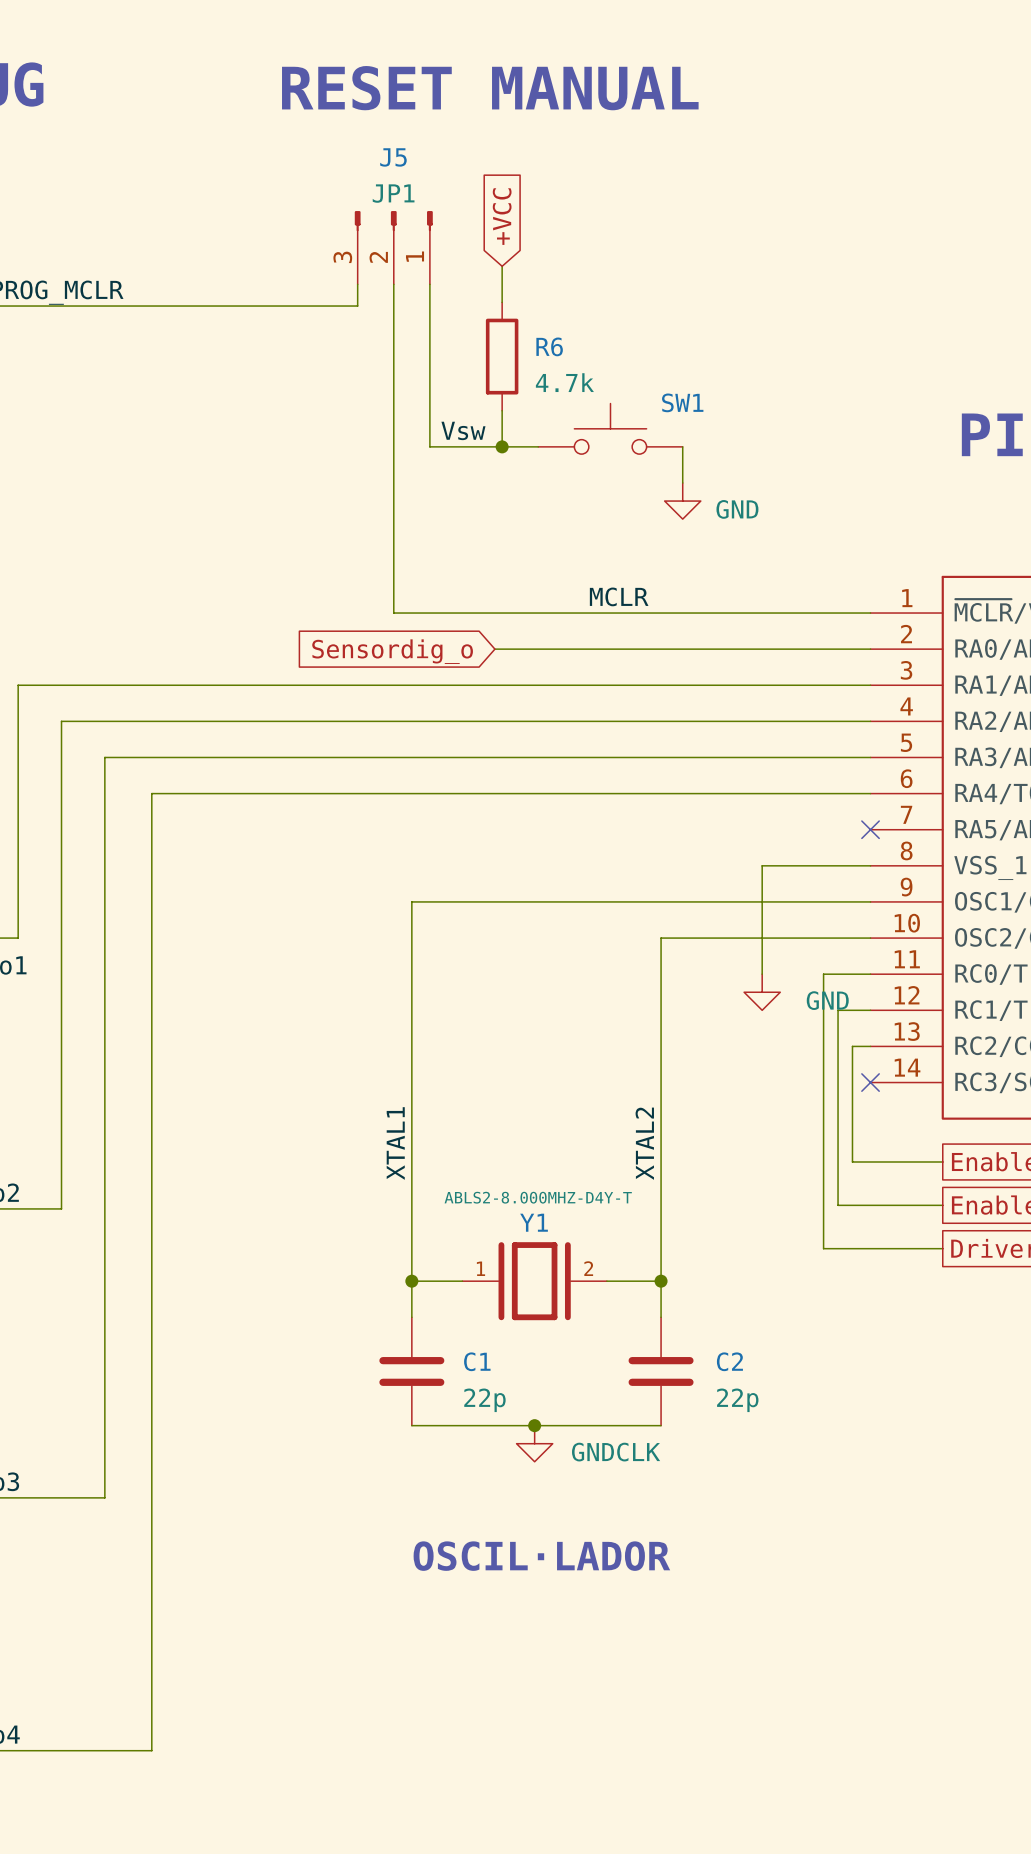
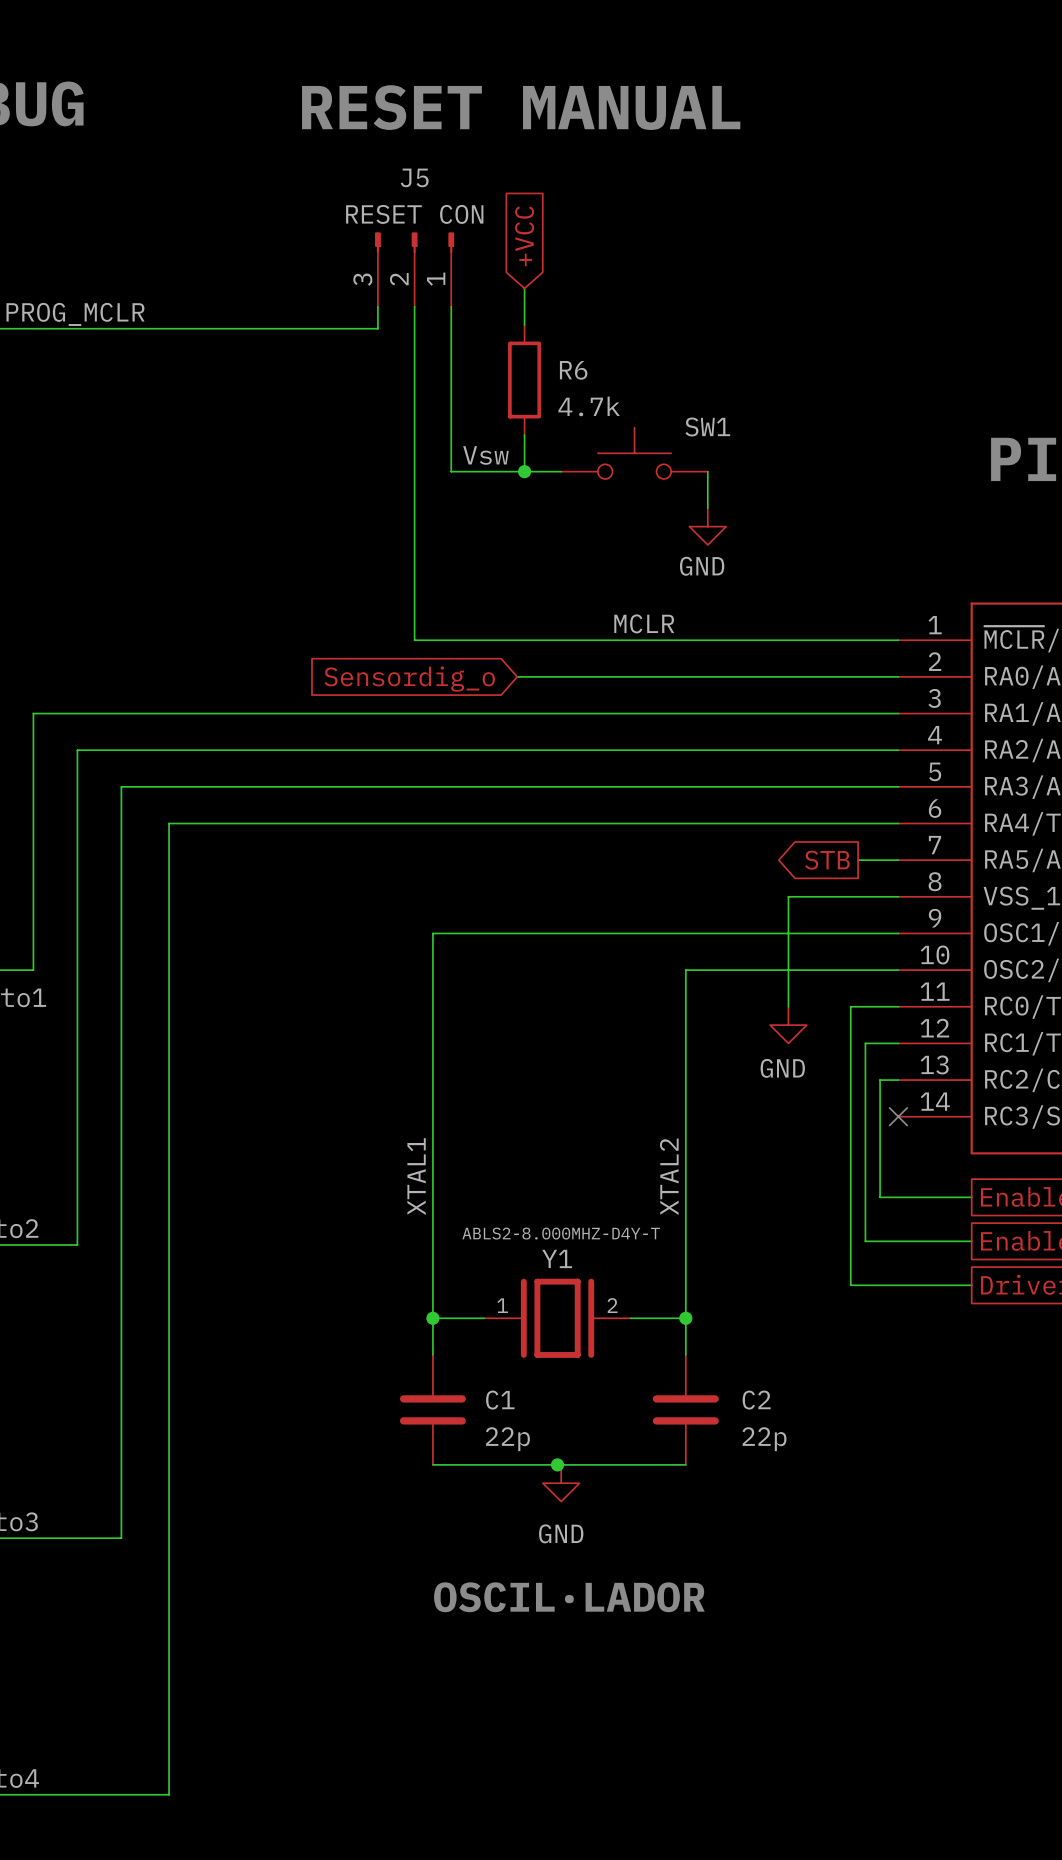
J5 value: JP1 (393, 193) -> RESET CON (414, 214)
power symbol text position: GND (737, 509) -> GND (702, 566)
global label: none -> STB (827, 860)
wire: none -> (858, 860) (898, 860)
no-connect mark: (870, 829) -> none
power symbol text position: GND (827, 1000) -> GND (782, 1068)
power symbol: GNDCLK (534, 1443) -> GND (561, 1483)

